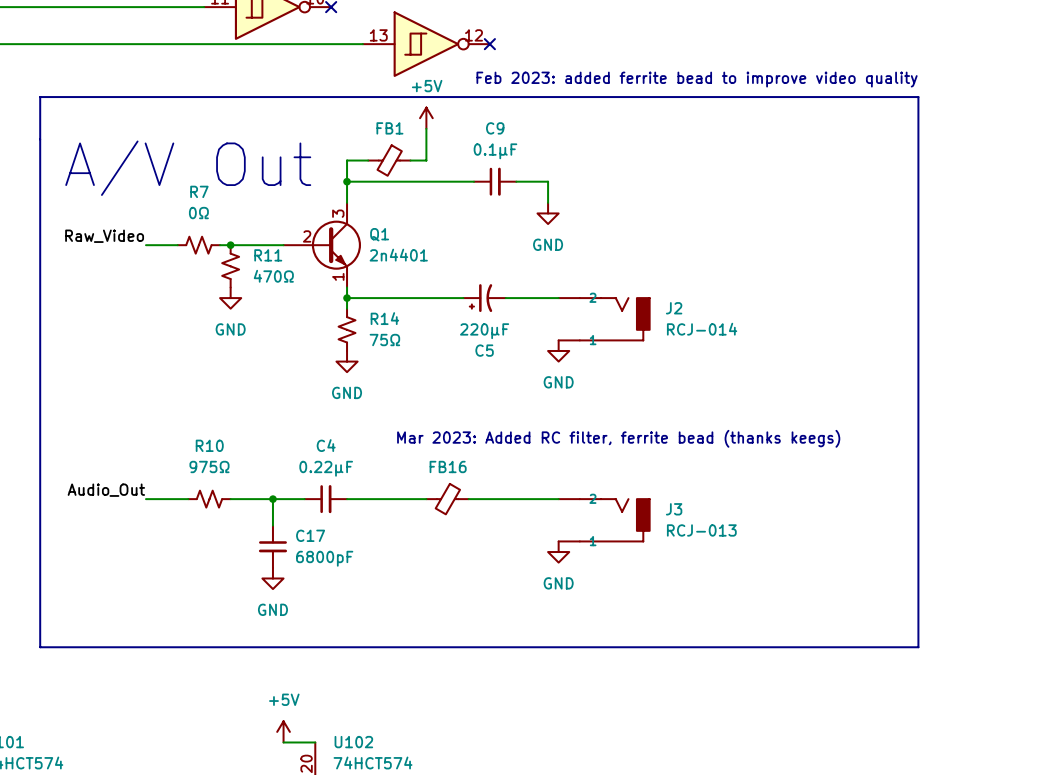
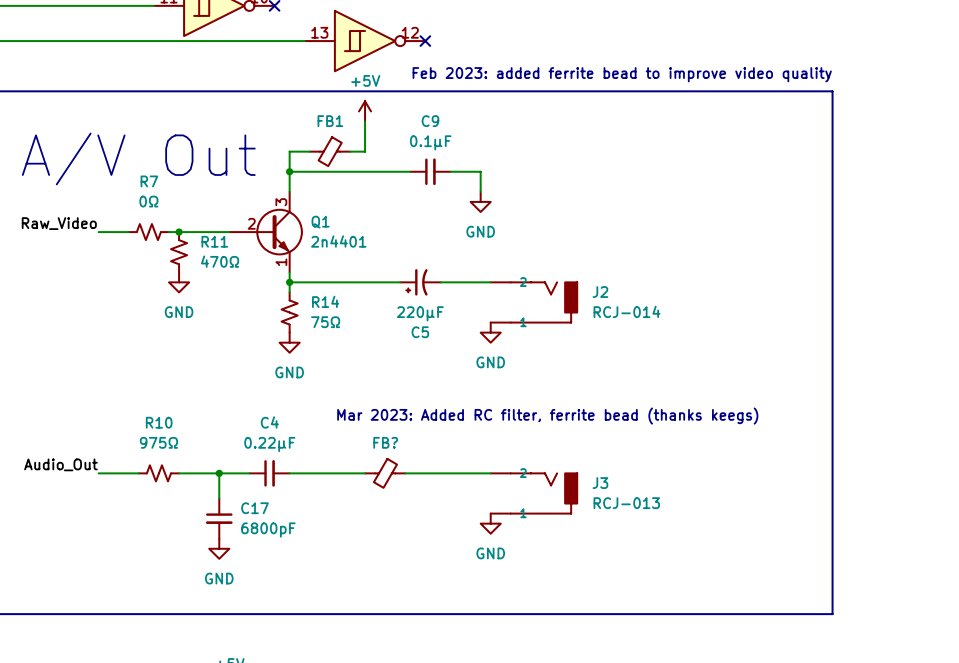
FB16 name: FB16 (448, 466) -> FB? (385, 442)

